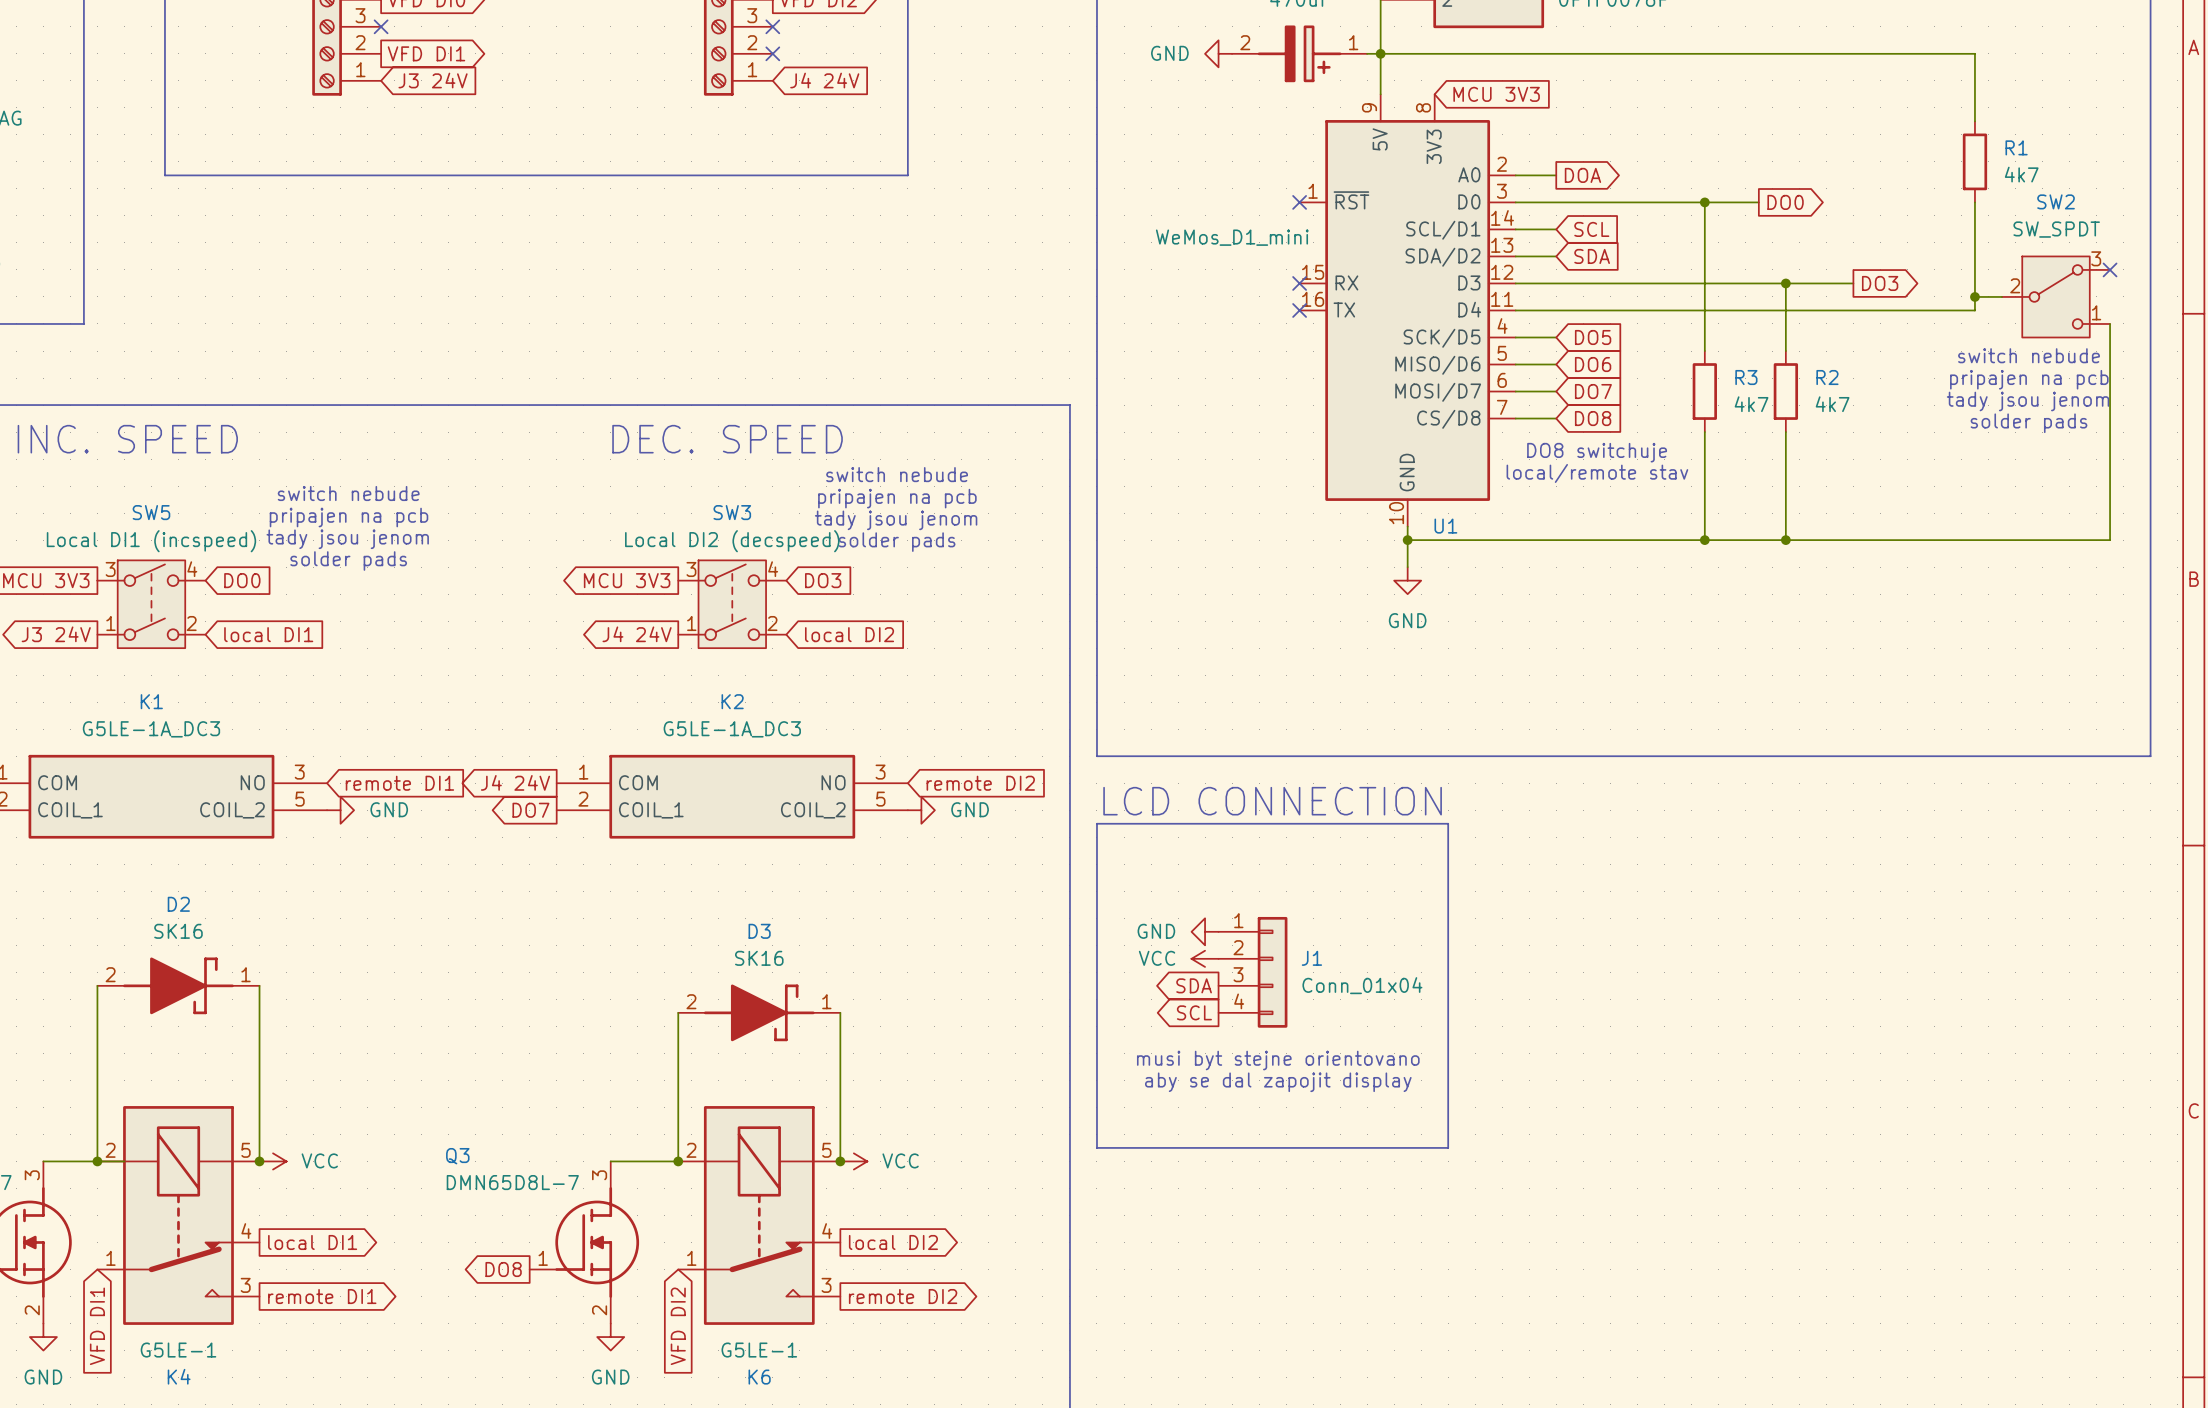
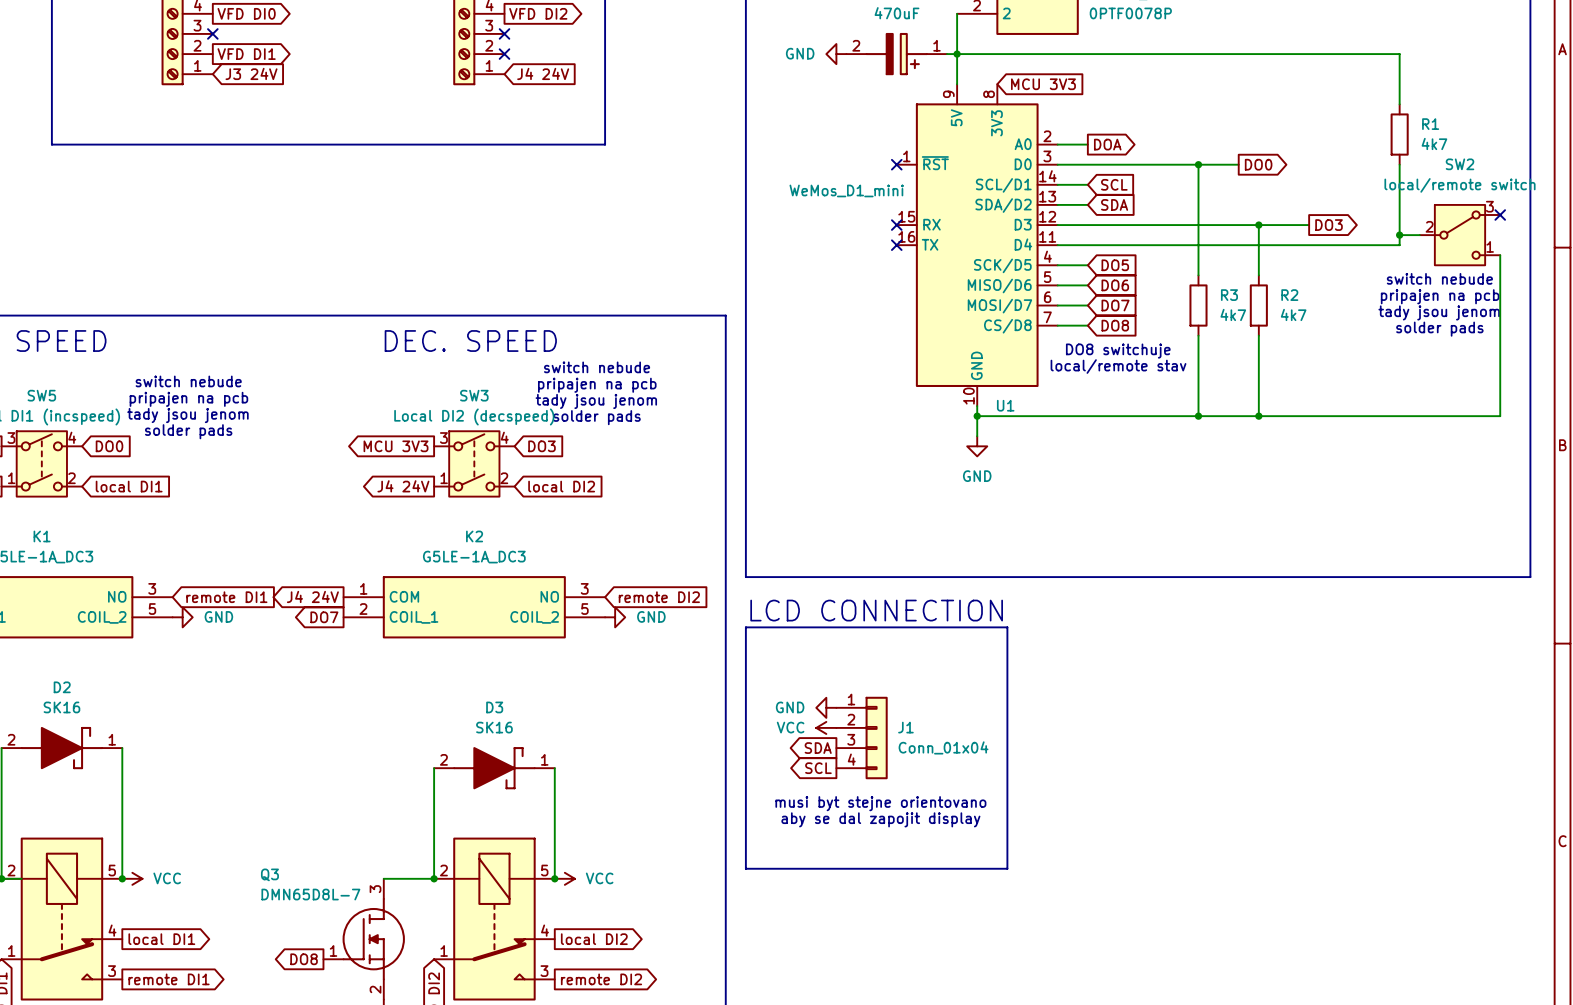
SW2 value: SW_SPDT (2056, 229) -> local/remote switch (1460, 185)

